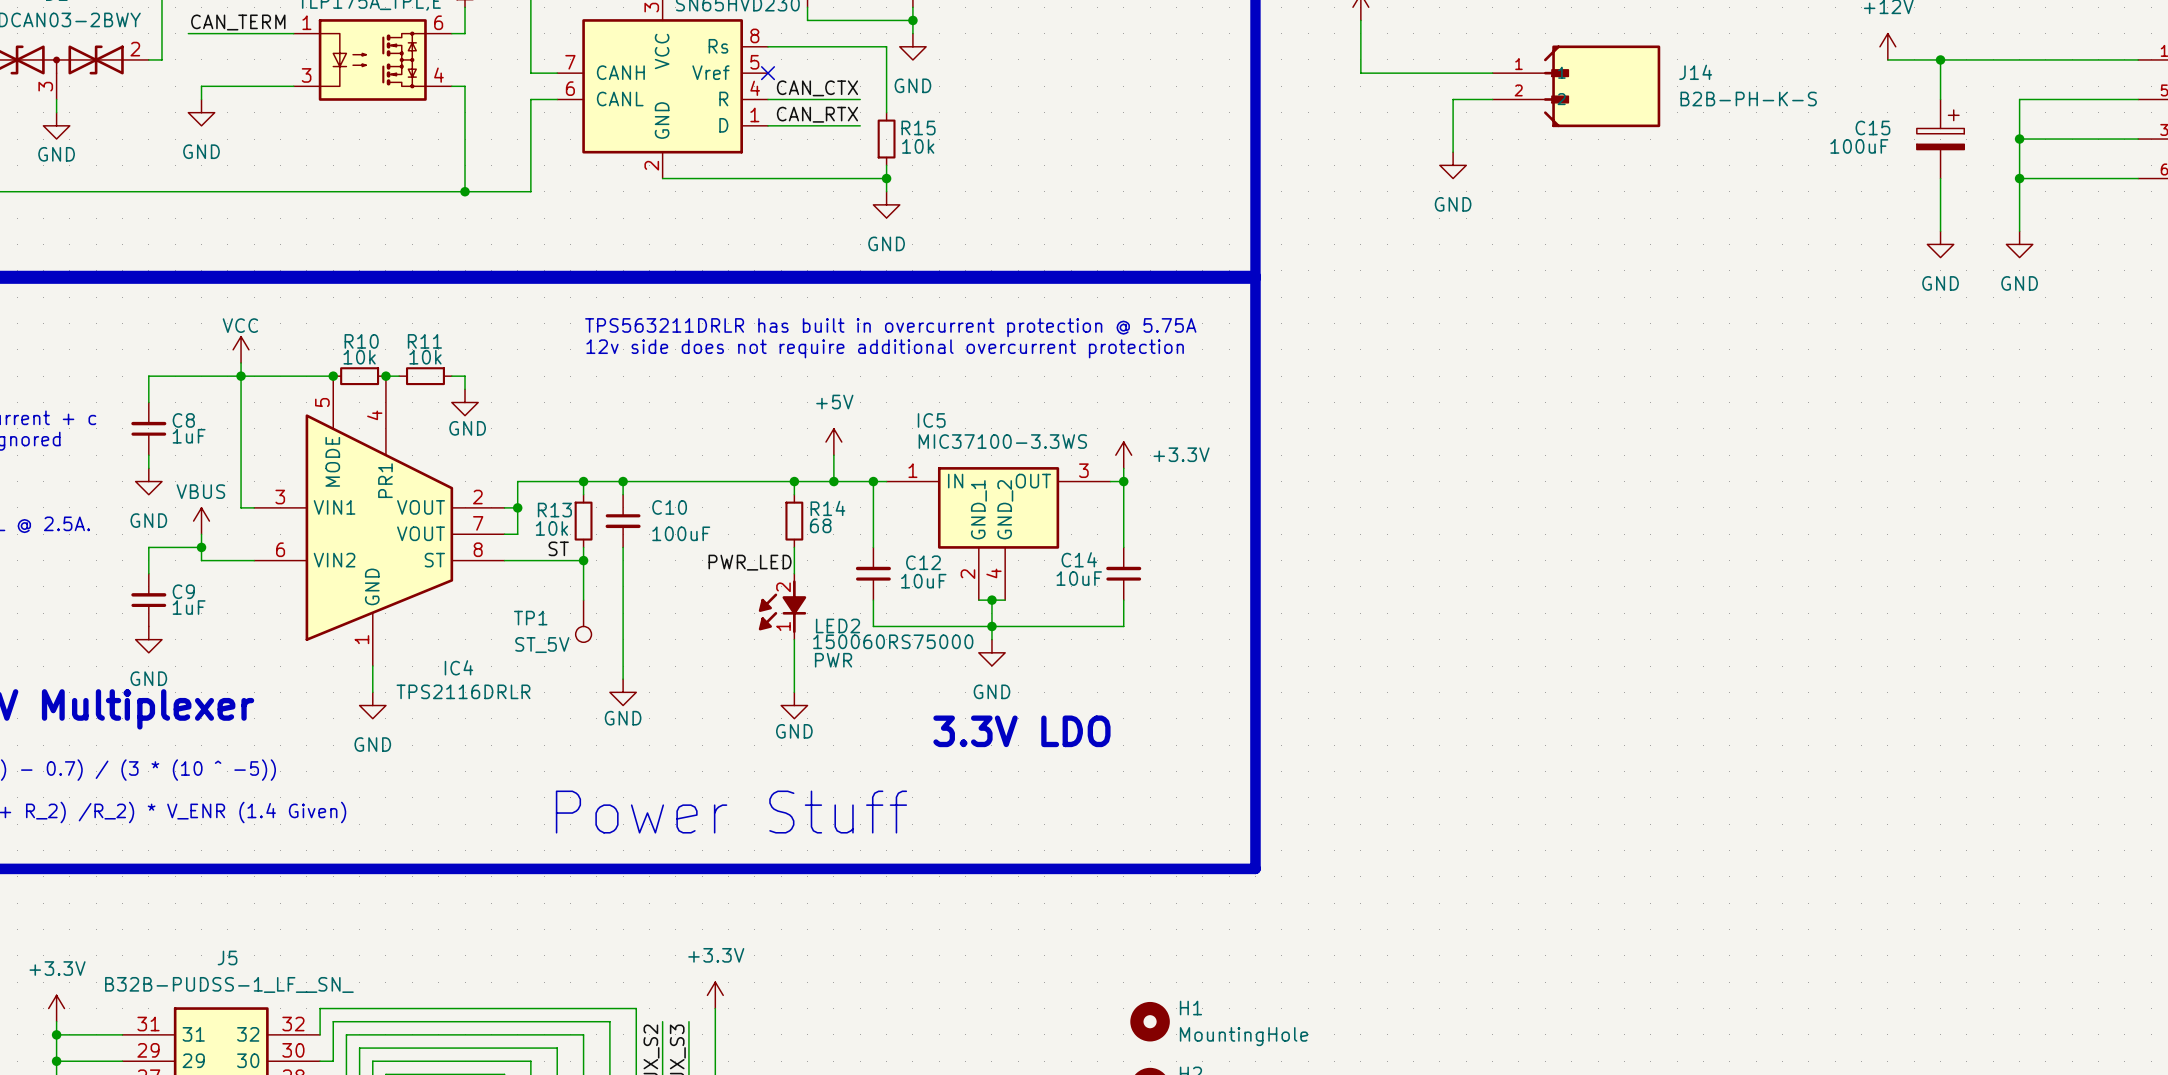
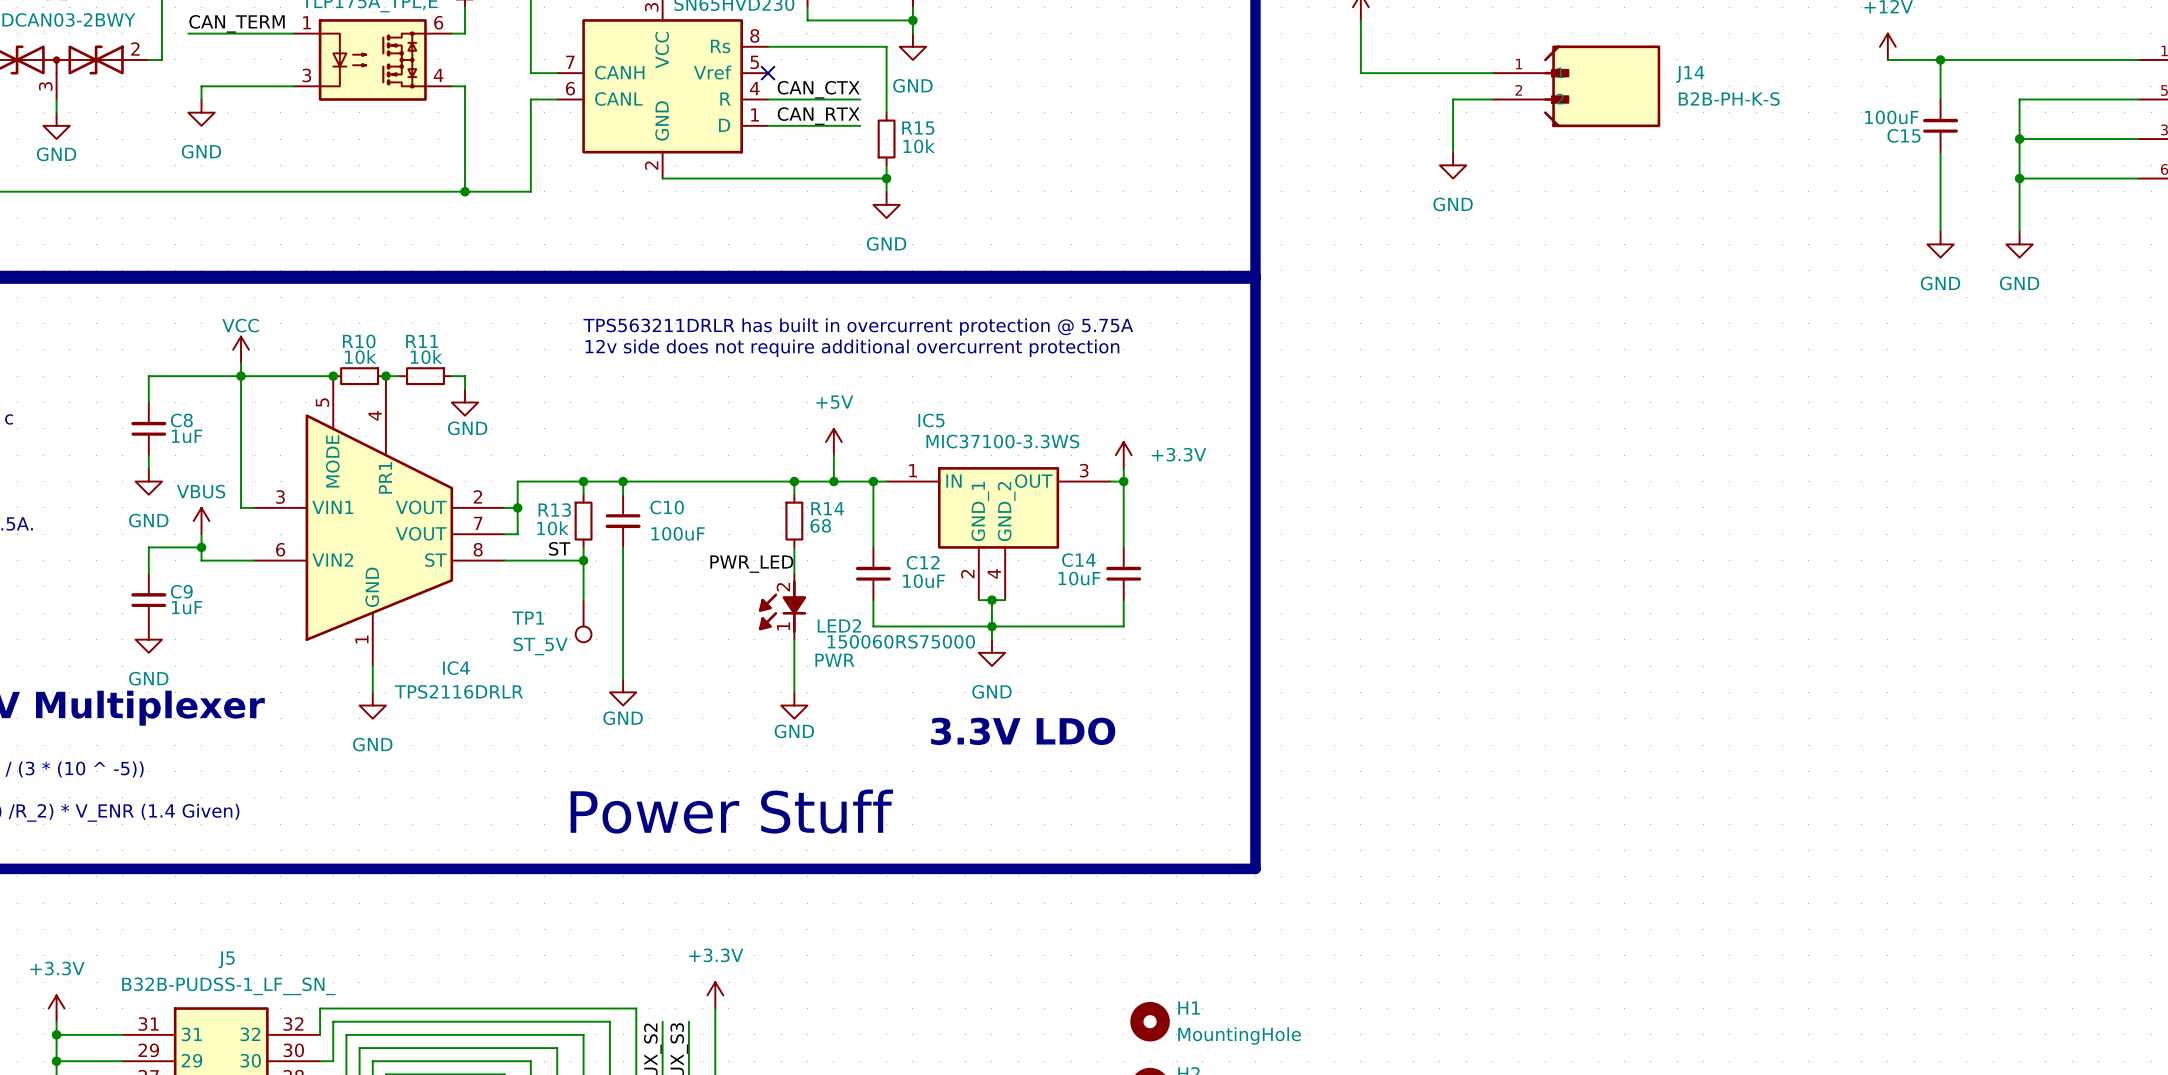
C15 symbol: [1916, 99, 1965, 179] -> [1923, 99, 1959, 153]
C15 name position: C15 (1872, 127) -> C15 (1904, 135)
C15 value position: 100uF (1859, 146) -> 100uF (1891, 117)

